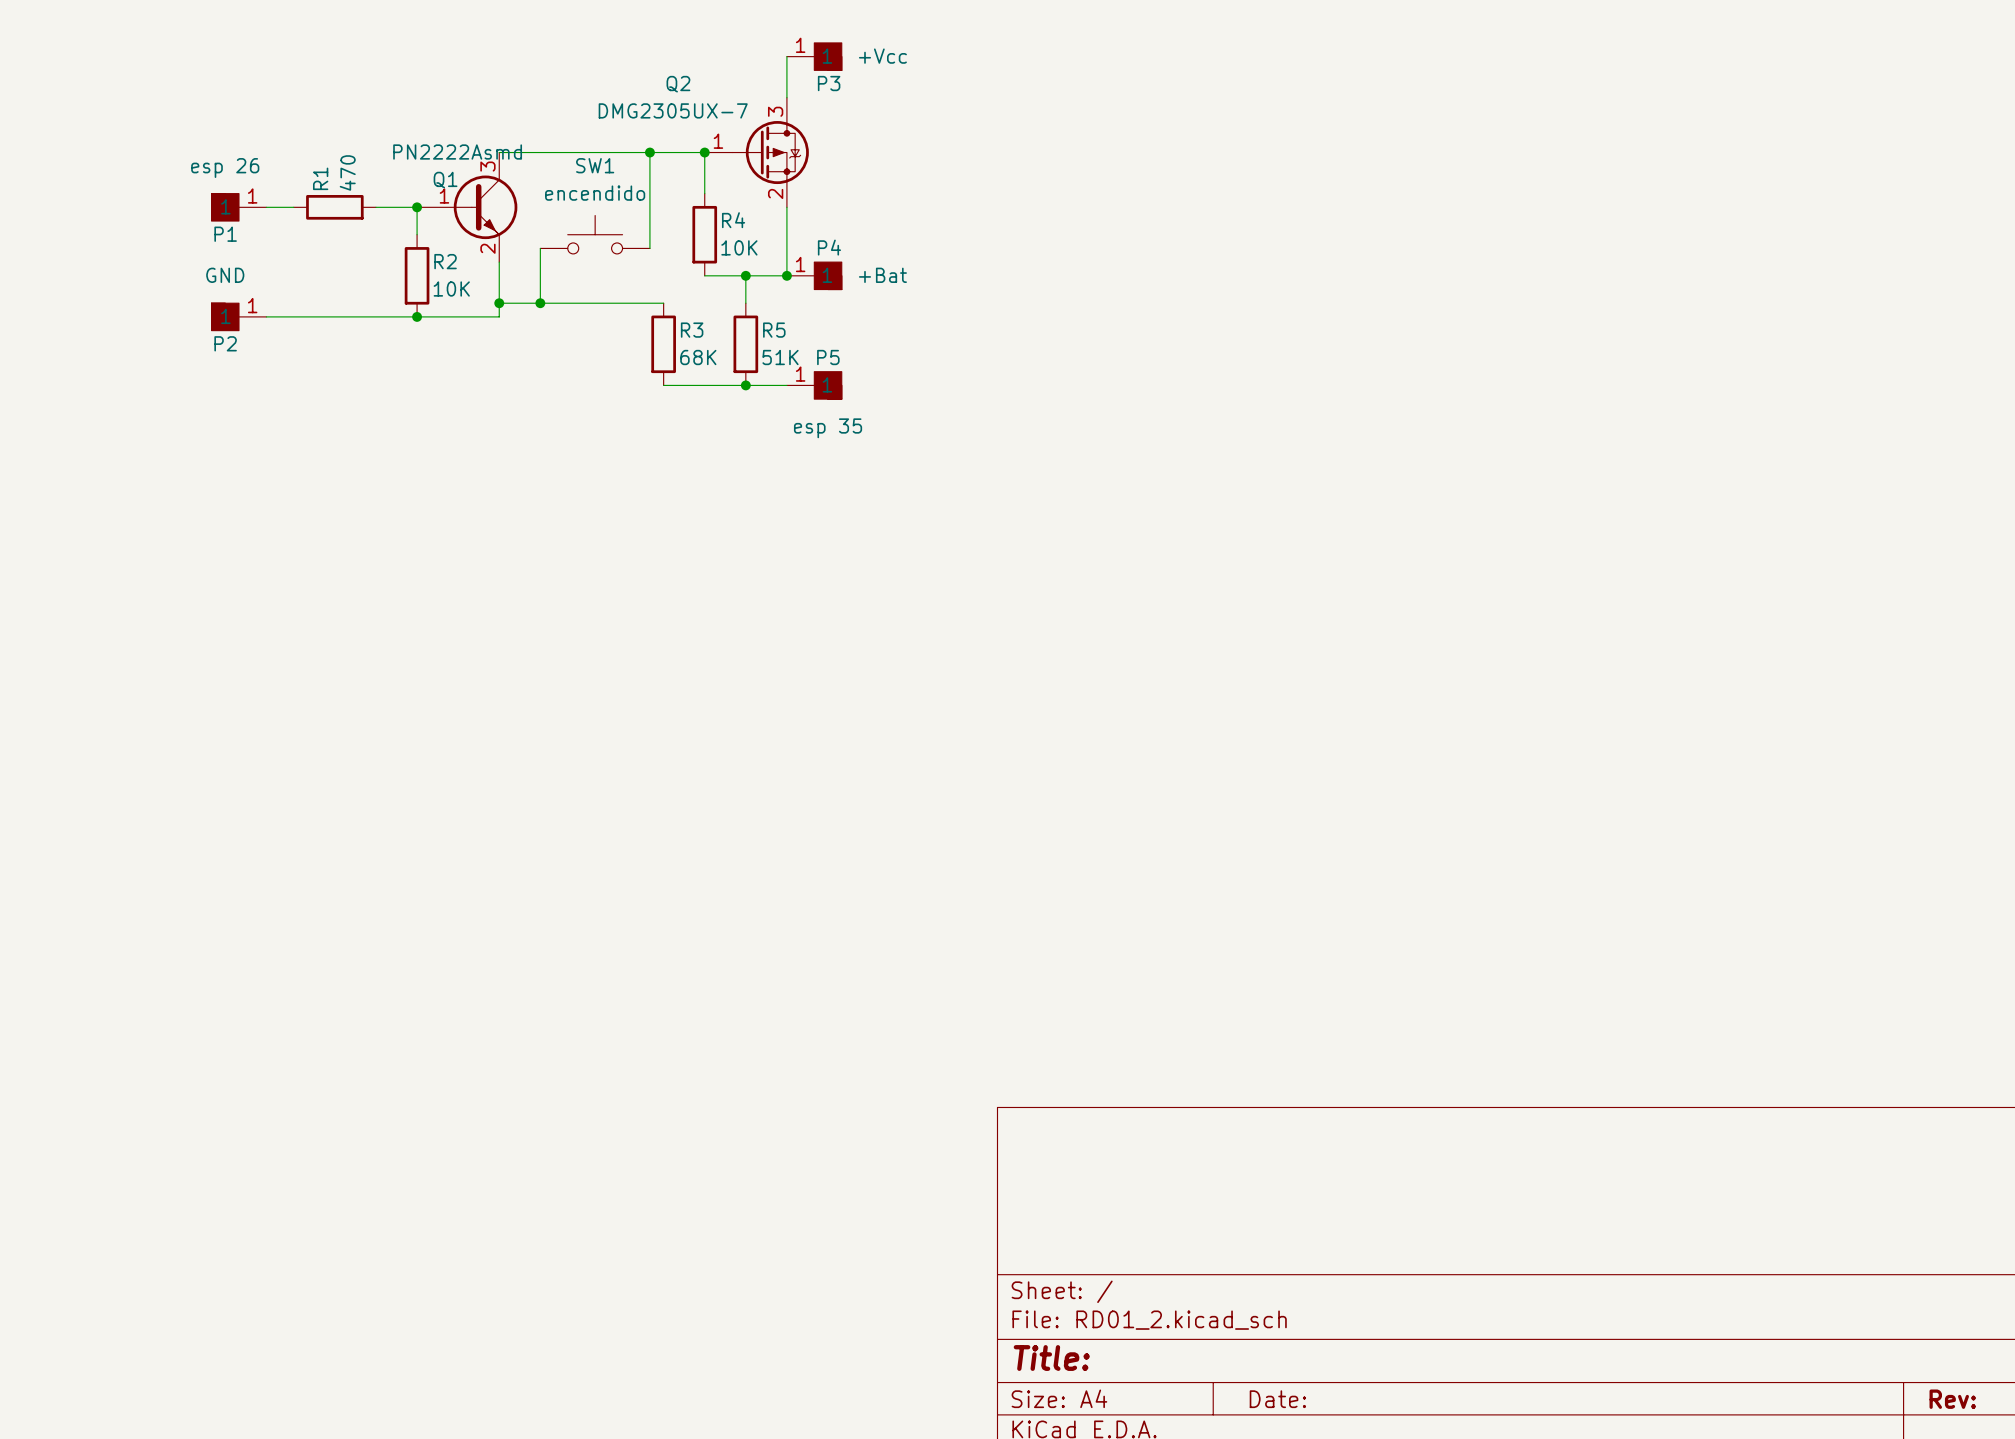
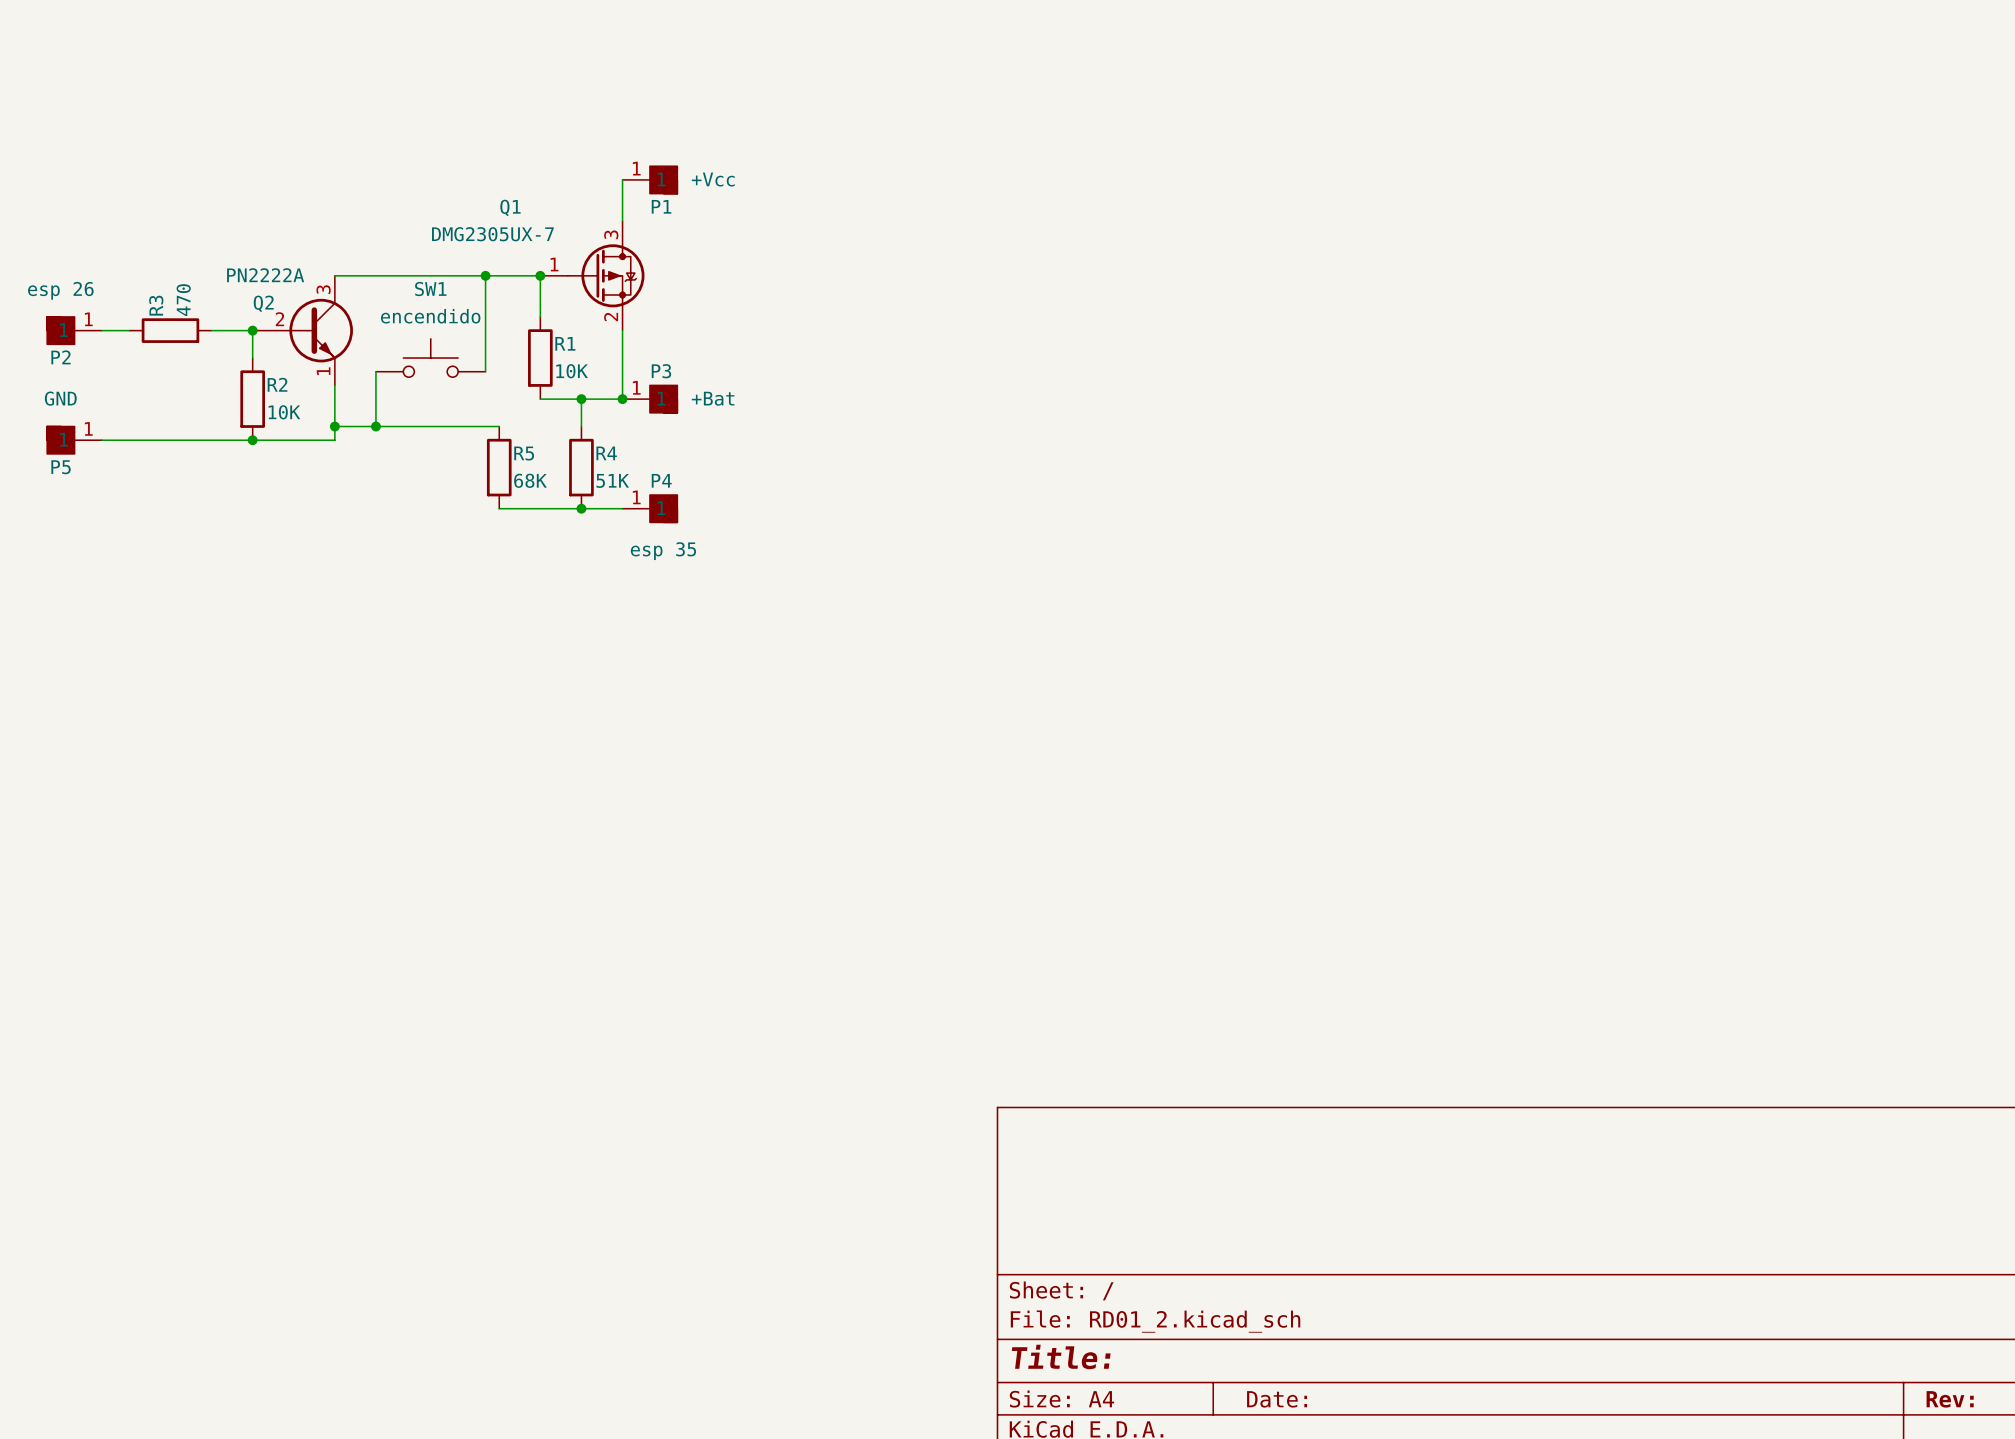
wire: (786, 56) (786, 97) -> (622, 179) (622, 221)
P3 position: (814, 56) -> (649, 399)
P3 value: +Vcc (882, 56) -> +Bat (713, 398)
P3 name position: P3 (829, 83) -> P3 (661, 371)
Q2 name position: Q2 (678, 84) -> Q2 (263, 303)
Q2 symbol: [704, 97, 809, 208] -> [252, 275, 353, 386]
Q2 value: DMG2305UX-7 (673, 110) -> PN2222A (265, 275)
Q1 symbol: [417, 152, 518, 263] -> [540, 221, 645, 331]
Q1 value: PN2222Asmd (457, 152) -> DMG2305UX-7 (492, 234)
wire: (499, 152) (704, 152) (704, 193) -> none
wire: (649, 152) (649, 248) -> (485, 275) (485, 371)
junction: (649, 152) -> none
junction: (704, 152) -> none
P1 value: esp 26 (225, 168) -> +Vcc (713, 179)
R1 value: 470 (347, 172) -> 10K (572, 371)
Q1 name position: Q1 (445, 180) -> Q1 (510, 207)
P1 rotation: 0° (225, 207) -> 180° (663, 179)
P1 position: (238, 207) -> (649, 179)
wire: (266, 207) (293, 207) -> (101, 330) (129, 330)
R1 rotation: 0° (334, 207) -> 90° clockwise (540, 358)
R1 position: (334, 207) -> (540, 358)
wire: (375, 207) (417, 207) (417, 234) -> (211, 330) (252, 330) (252, 358)
junction: (417, 207) -> none
wire: (786, 207) (786, 275) (704, 275) -> (622, 330) (622, 399) (540, 399)
P1 name position: P1 (225, 234) -> P1 (661, 206)
SW1 position: (595, 234) -> (430, 358)
R4 position: (704, 234) -> (581, 467)
R4 value: 10K (739, 247) -> 51K (612, 480)
wire: (540, 248) (540, 275) -> (334, 275) (540, 275)
wire: (499, 262) (499, 316) (266, 316) -> (334, 385) (334, 440) (101, 440)
P2 value: GND (225, 275) -> esp 26 (60, 290)
R2 position: (417, 275) -> (252, 399)
junction: none -> (485, 275)
junction: none -> (540, 275)
wire: (745, 275) (745, 303) -> (581, 399) (581, 426)
junction: (745, 275) -> none
junction: (786, 275) -> none
P4 position: (814, 275) -> (649, 508)
P4 value: +Bat (882, 275) -> esp 35 (663, 551)
wire: (499, 303) (663, 303) -> (334, 426) (499, 426)
junction: (499, 303) -> none
wire: none -> (540, 303) (540, 316)
junction: (540, 303) -> none
P2 position: (238, 316) -> (74, 330)
junction: (417, 316) -> none
junction: none -> (252, 330)
R3 name position: R3 (692, 330) -> R3 (156, 305)
R3 rotation: 0° (663, 344) -> 90° clockwise (170, 330)
R3 position: (663, 344) -> (170, 330)
R5 position: (745, 344) -> (499, 467)
R3 value: 68K (698, 357) -> 470 (183, 300)
R5 value: 51K (780, 357) -> 68K (530, 480)
wire: none -> (375, 371) (375, 426)
wire: (663, 385) (786, 385) -> (499, 508) (622, 508)
junction: (745, 385) -> none
P5 position: (814, 385) -> (74, 440)
P5 rotation: 0° (828, 385) -> 180° (60, 440)
junction: none -> (581, 399)
junction: none -> (622, 399)
junction: none -> (334, 426)
junction: none -> (375, 426)
P5 value: esp 35 (828, 428) -> GND (60, 398)
junction: none -> (252, 440)
junction: none -> (581, 508)

